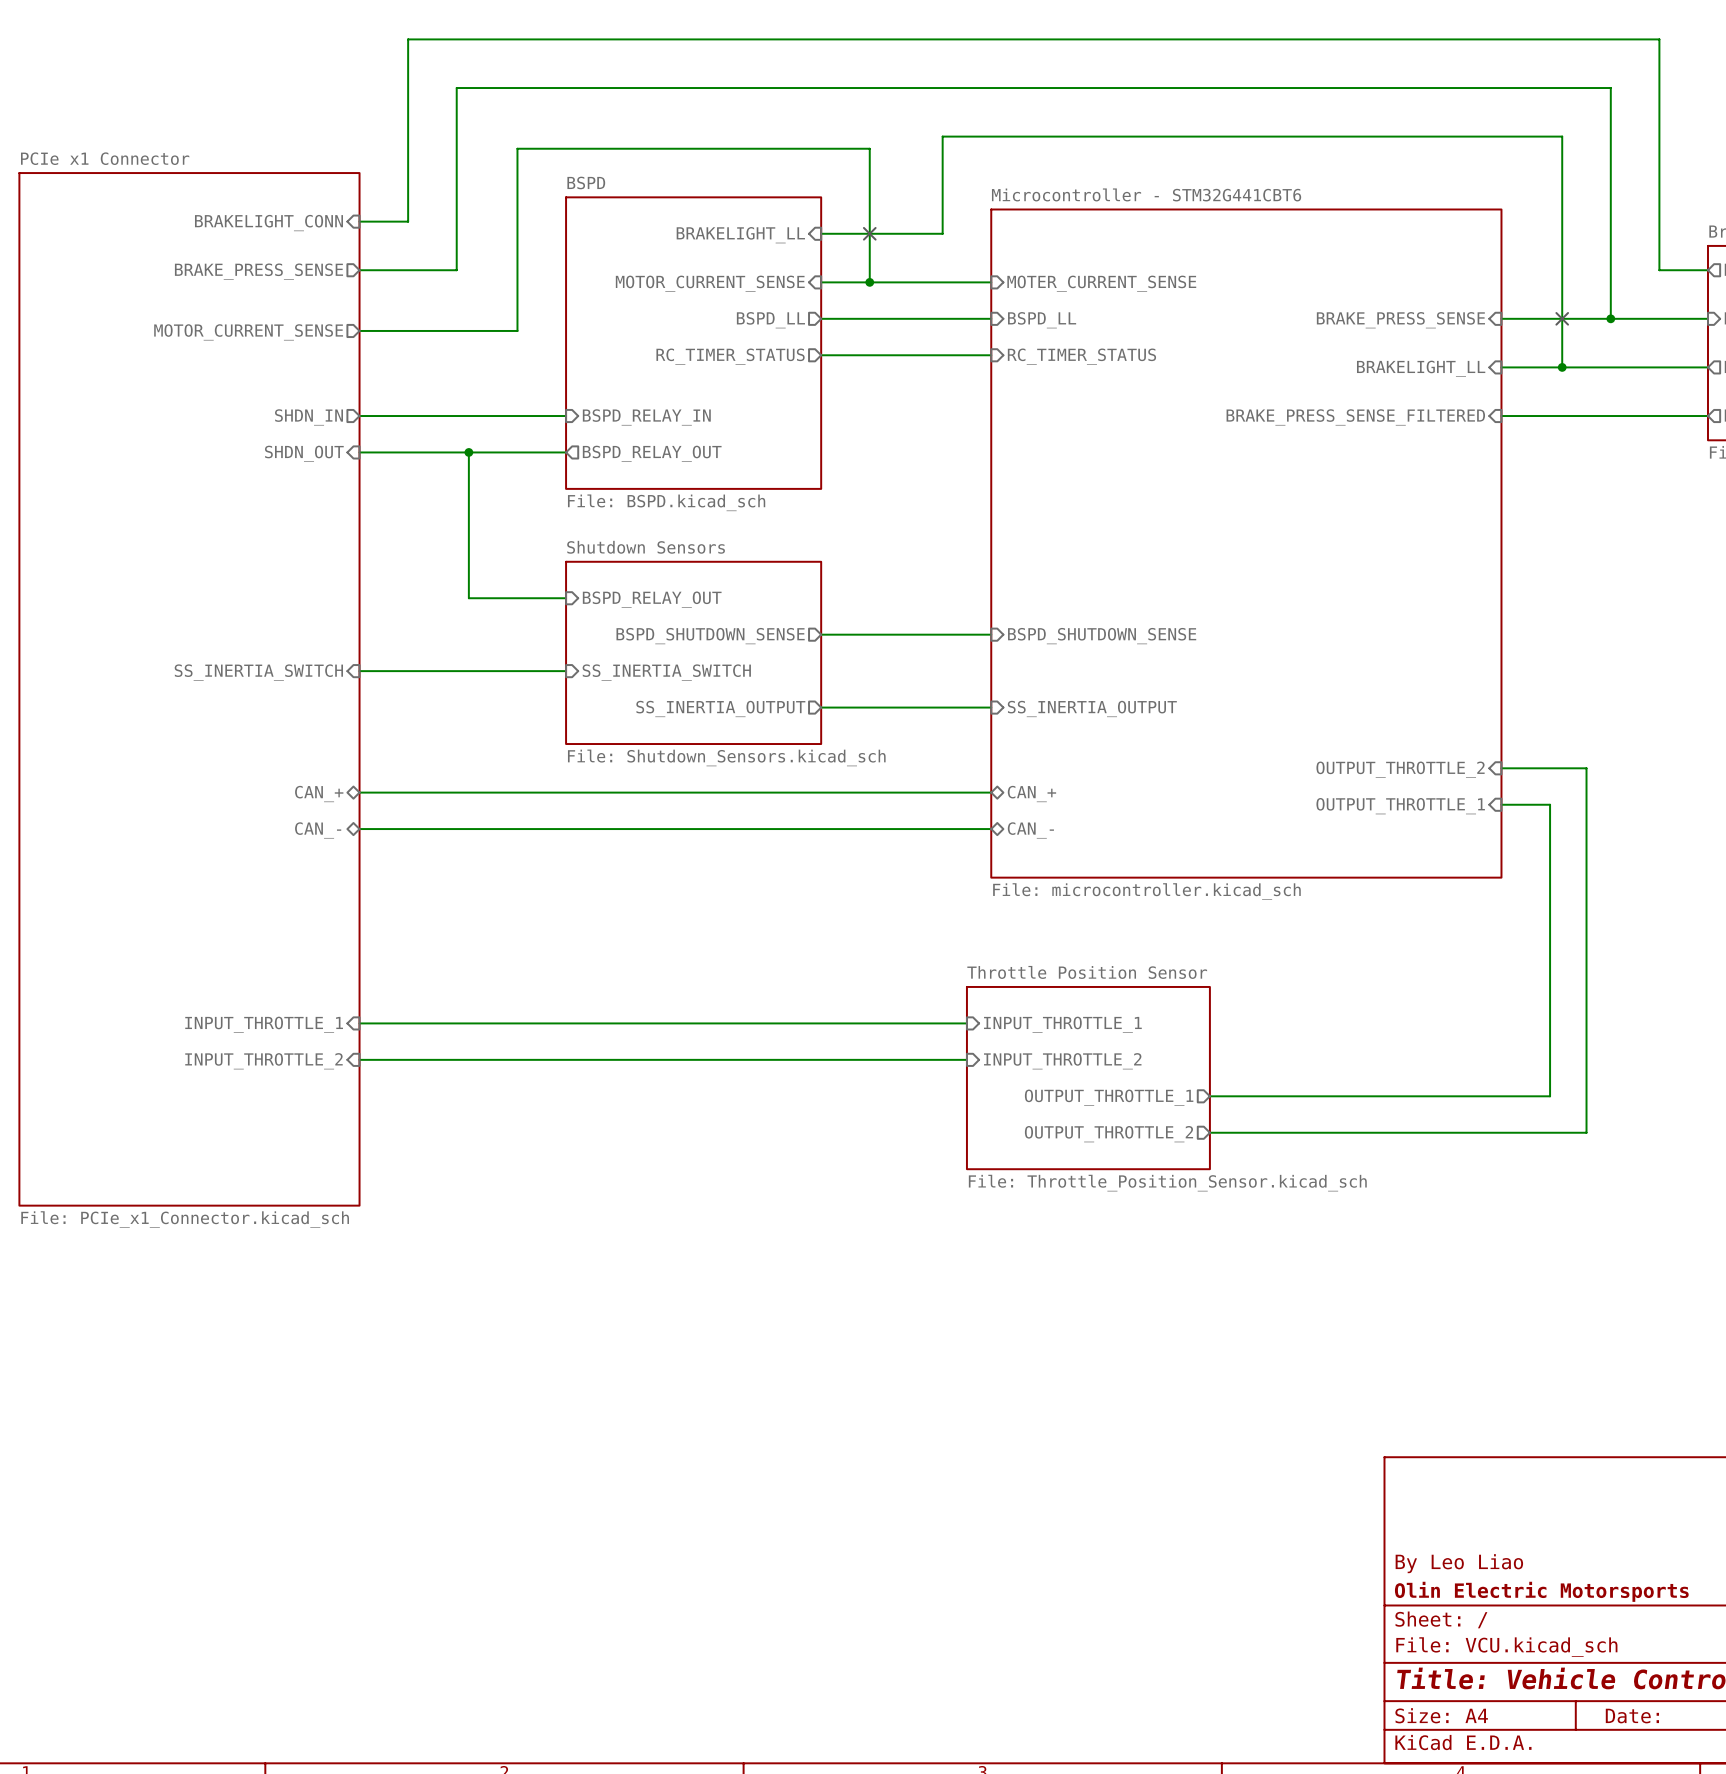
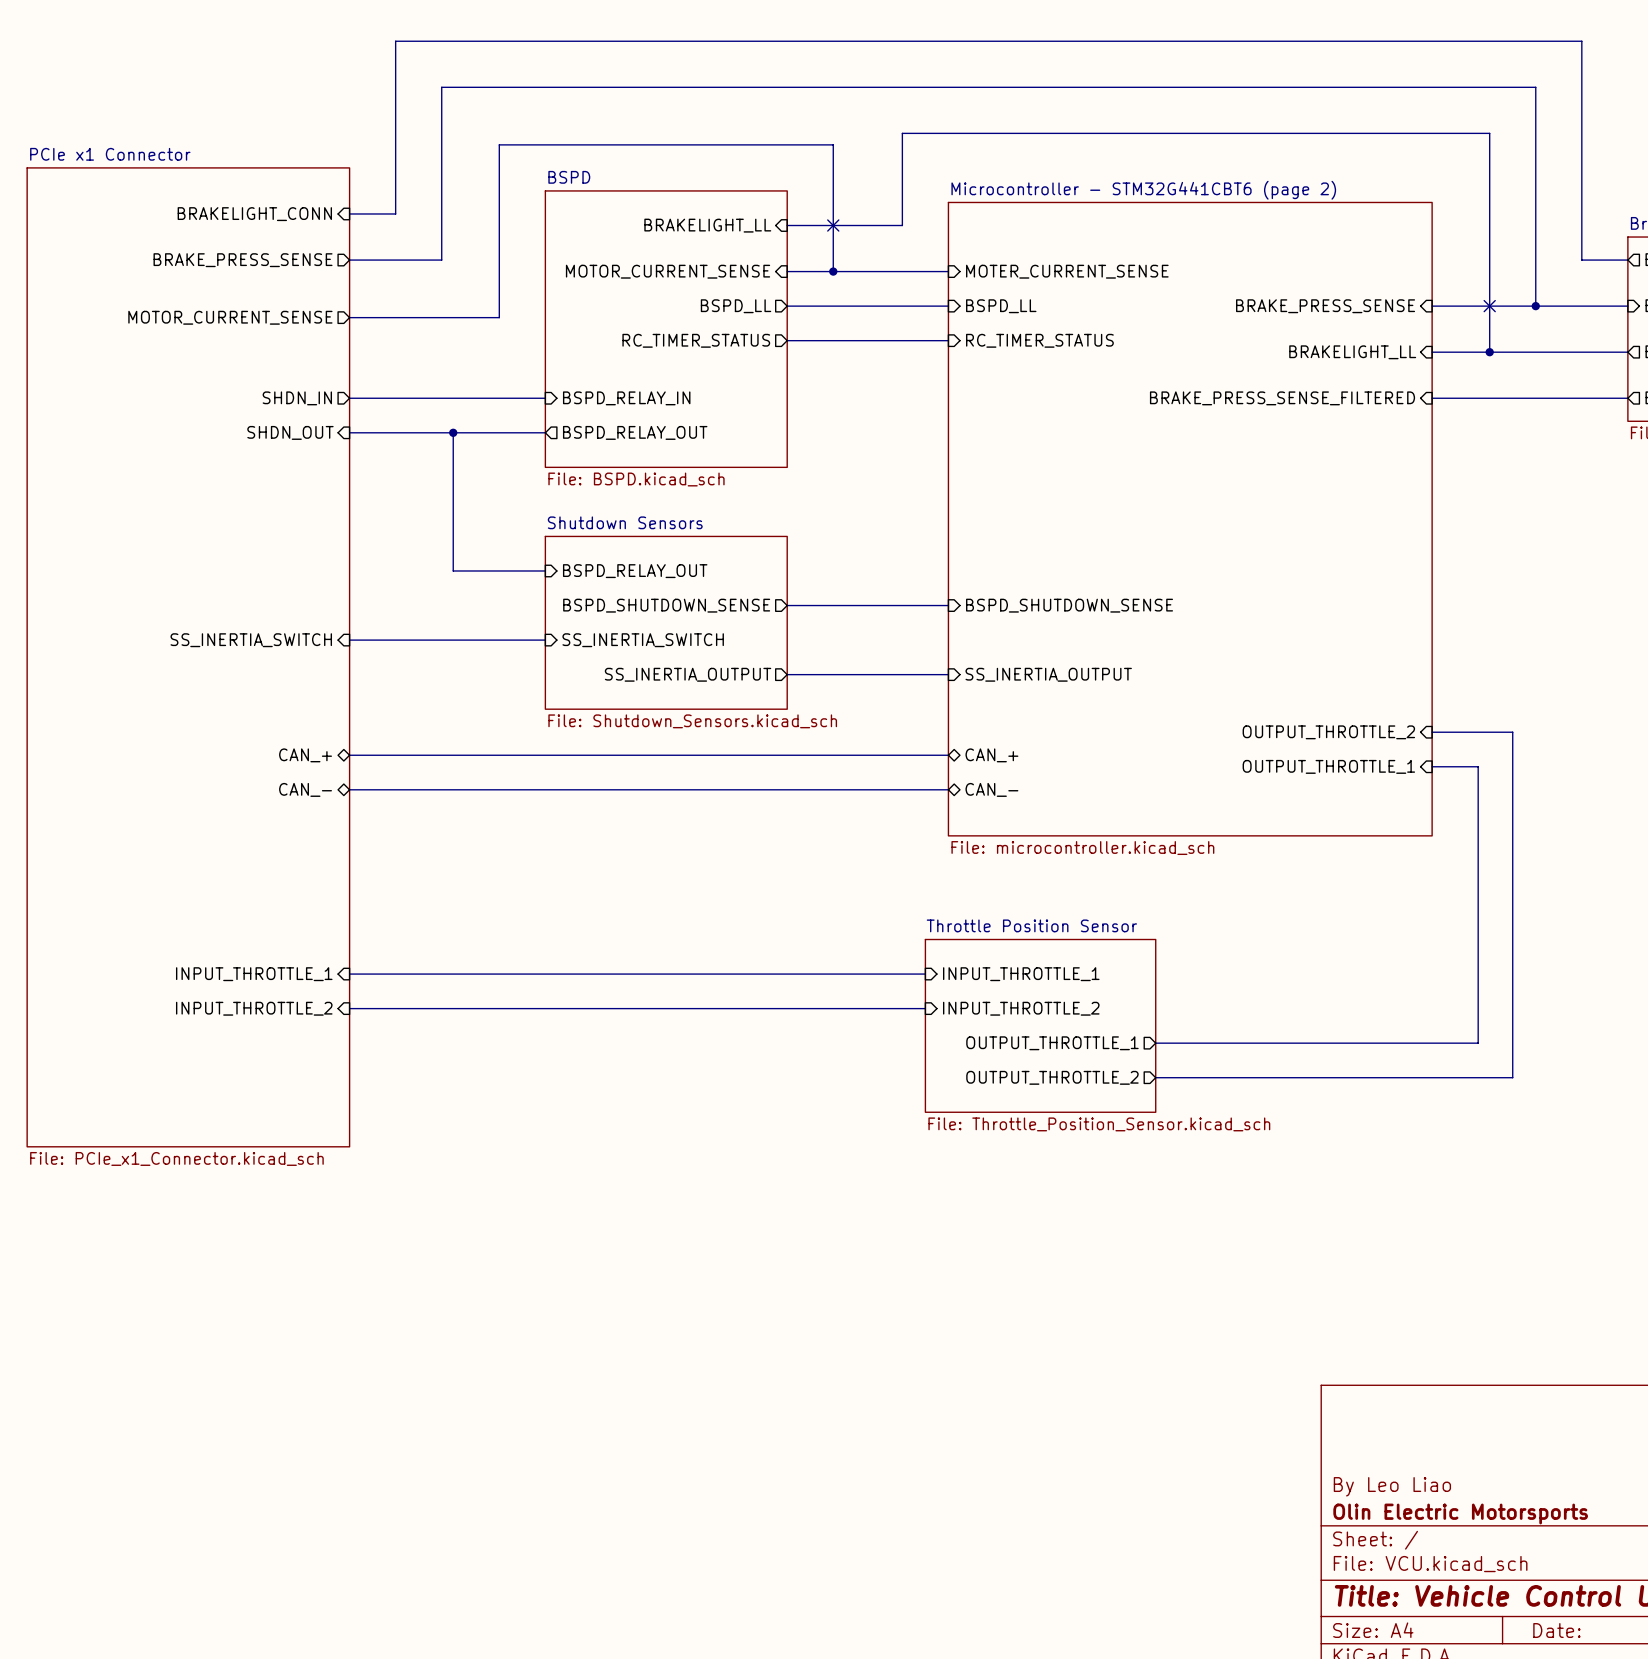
sheet Microcontroller - STM32G441CBT6 name: Microcontroller - STM32G441CBT6 (1146, 194) -> Microcontroller - STM32G441CBT6 (page 2) (1143, 190)

